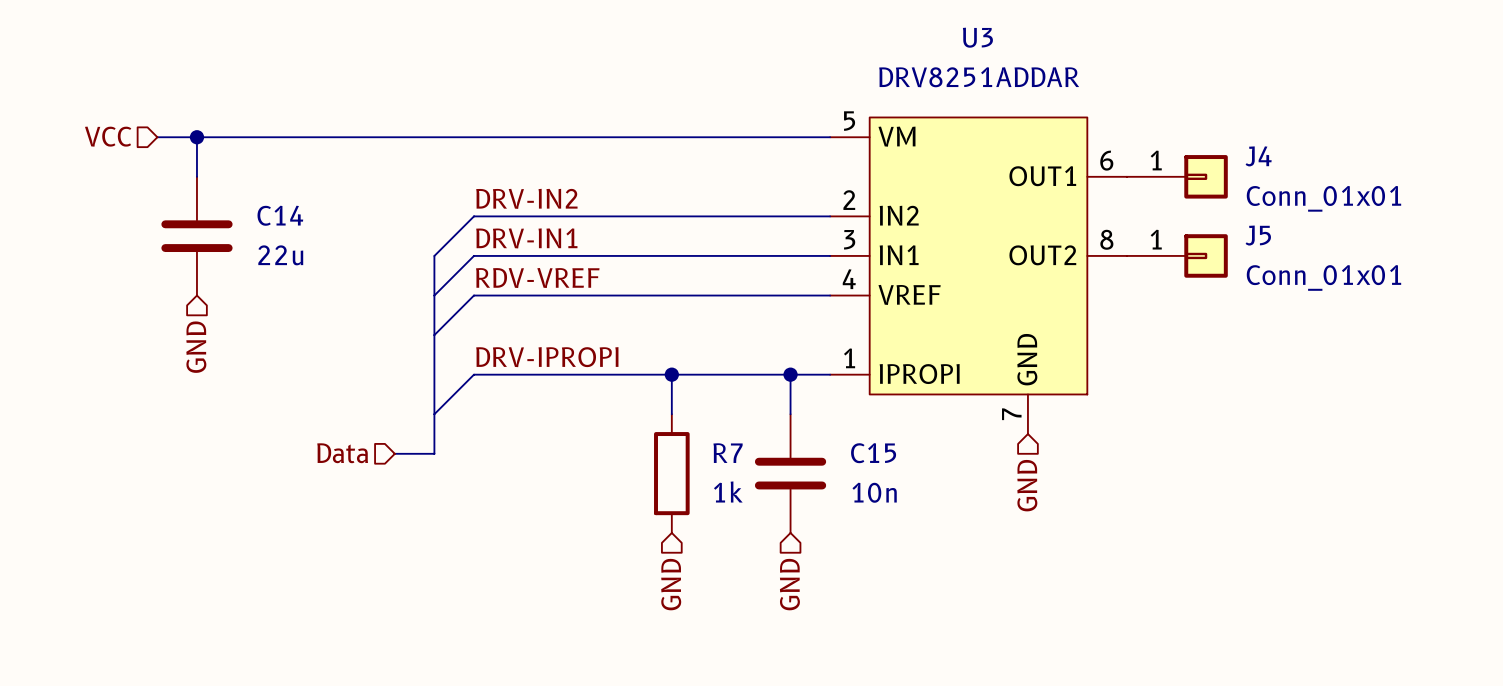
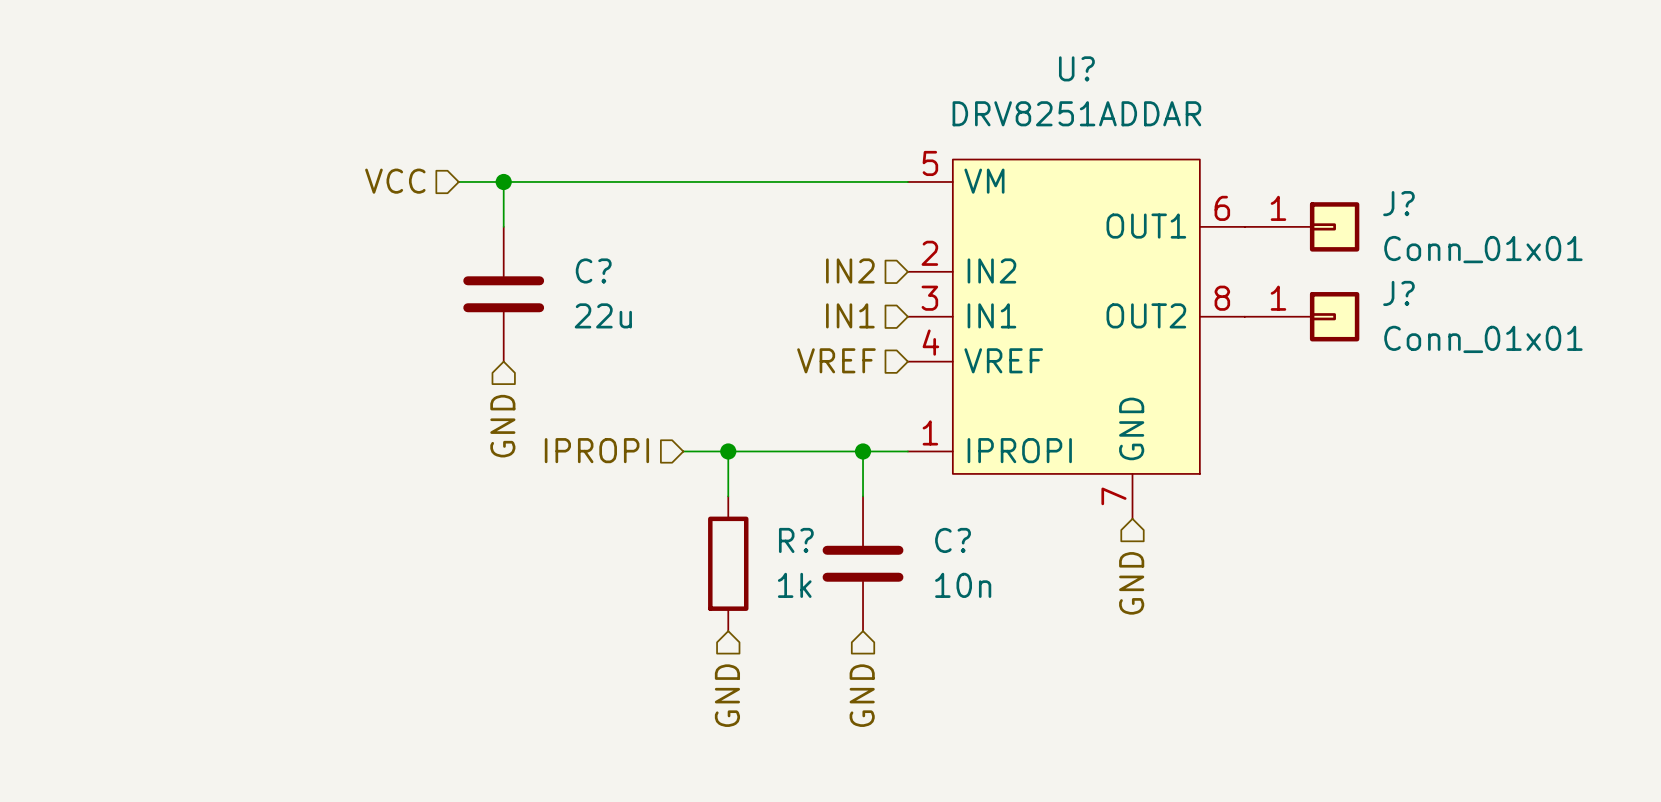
U3 name: U3 (977, 37) -> U? (1076, 68)
hierarchical label position: VCC (108, 136) -> VCC (395, 181)
wire: (157, 137) (434, 137) -> none
wire: (196, 137) (196, 176) -> (503, 181) (503, 226)
junction: (196, 137) -> none
junction: none -> (503, 181)
J4 name: J4 (1258, 156) -> J? (1398, 203)
label: DRV-IN2 (526, 198) -> none
hierarchical label: none -> IN2 (850, 270)
wire: (830, 216) (473, 216) (434, 255) -> none
J5 name: J5 (1258, 235) -> J? (1398, 293)
C14: 22u (196, 236) -> none
C?: none -> 22u (503, 294)
label: DRV-IN1 (526, 238) -> none
bus: (434, 255) (434, 453) (394, 453) -> none
hierarchical label: none -> IN1 (850, 315)
wire: (830, 255) (473, 255) (434, 295) -> none
label: RDV-VREF (537, 278) -> none
hierarchical label: none -> VREF (836, 360)
wire: (830, 295) (473, 295) (434, 335) -> none
hierarchical label position: GND (196, 347) -> GND (502, 426)
label: DRV-IPROPI (547, 357) -> none
hierarchical label: none -> IPROPI (596, 450)
wire: (632, 374) (473, 374) (434, 414) -> none
hierarchical label: Data (342, 453) -> none
R7 name: R7 (728, 453) -> R? (796, 540)
C15 name: C15 (873, 453) -> C? (953, 540)

